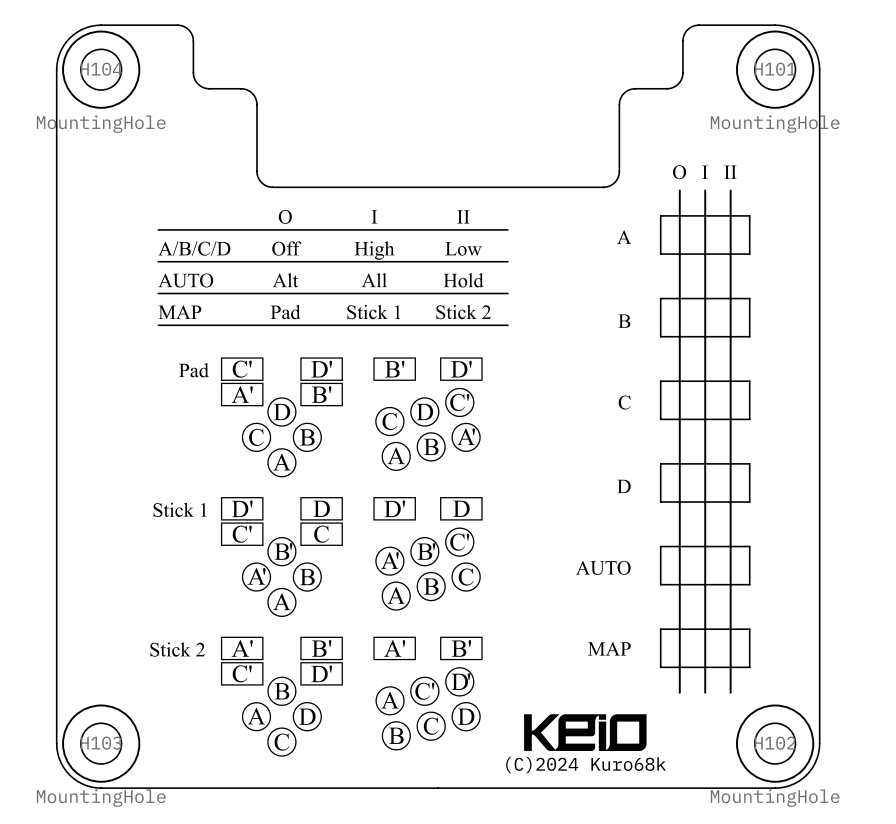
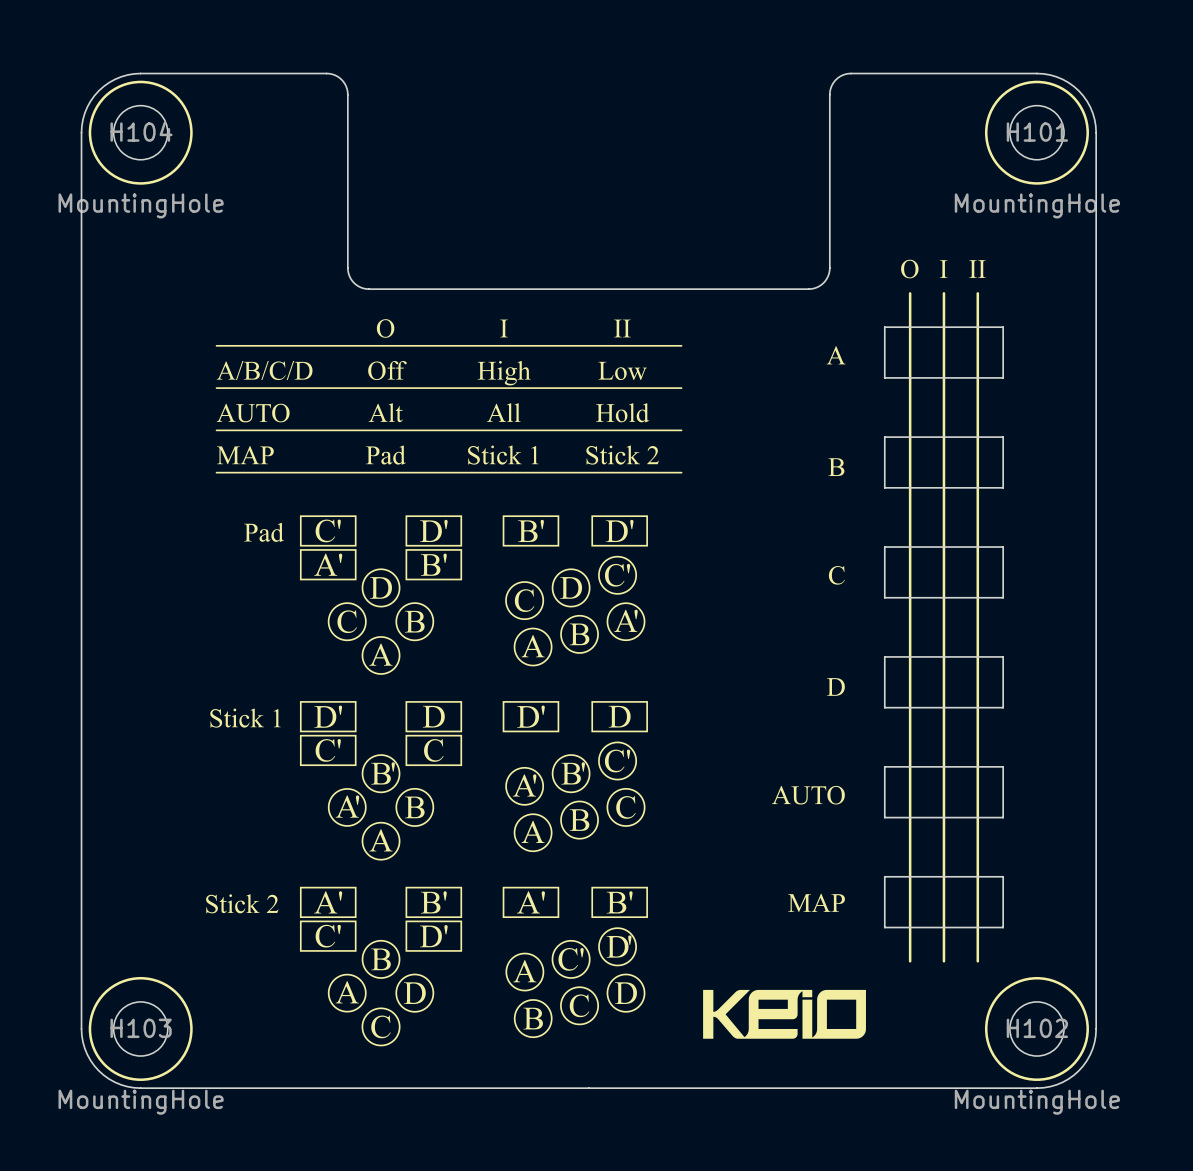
board edge: (177, 25) (187, 28) (192, 34) (193, 74) (198, 84) (207, 88) (247, 89) (254, 96) (256, 104) -> (242, 73) (326, 73) (334, 75) (341, 79) (346, 86) (347, 94) (347, 179)
board edge: (698, 25) (689, 28) (684, 34) (682, 74) (678, 84) (669, 88) (629, 89) (622, 94) (619, 104) -> (935, 73) (850, 73) (842, 75) (836, 79) (831, 86) (829, 94) (829, 179)
text: (C)2024 Kuro68k (586, 765) -> none

